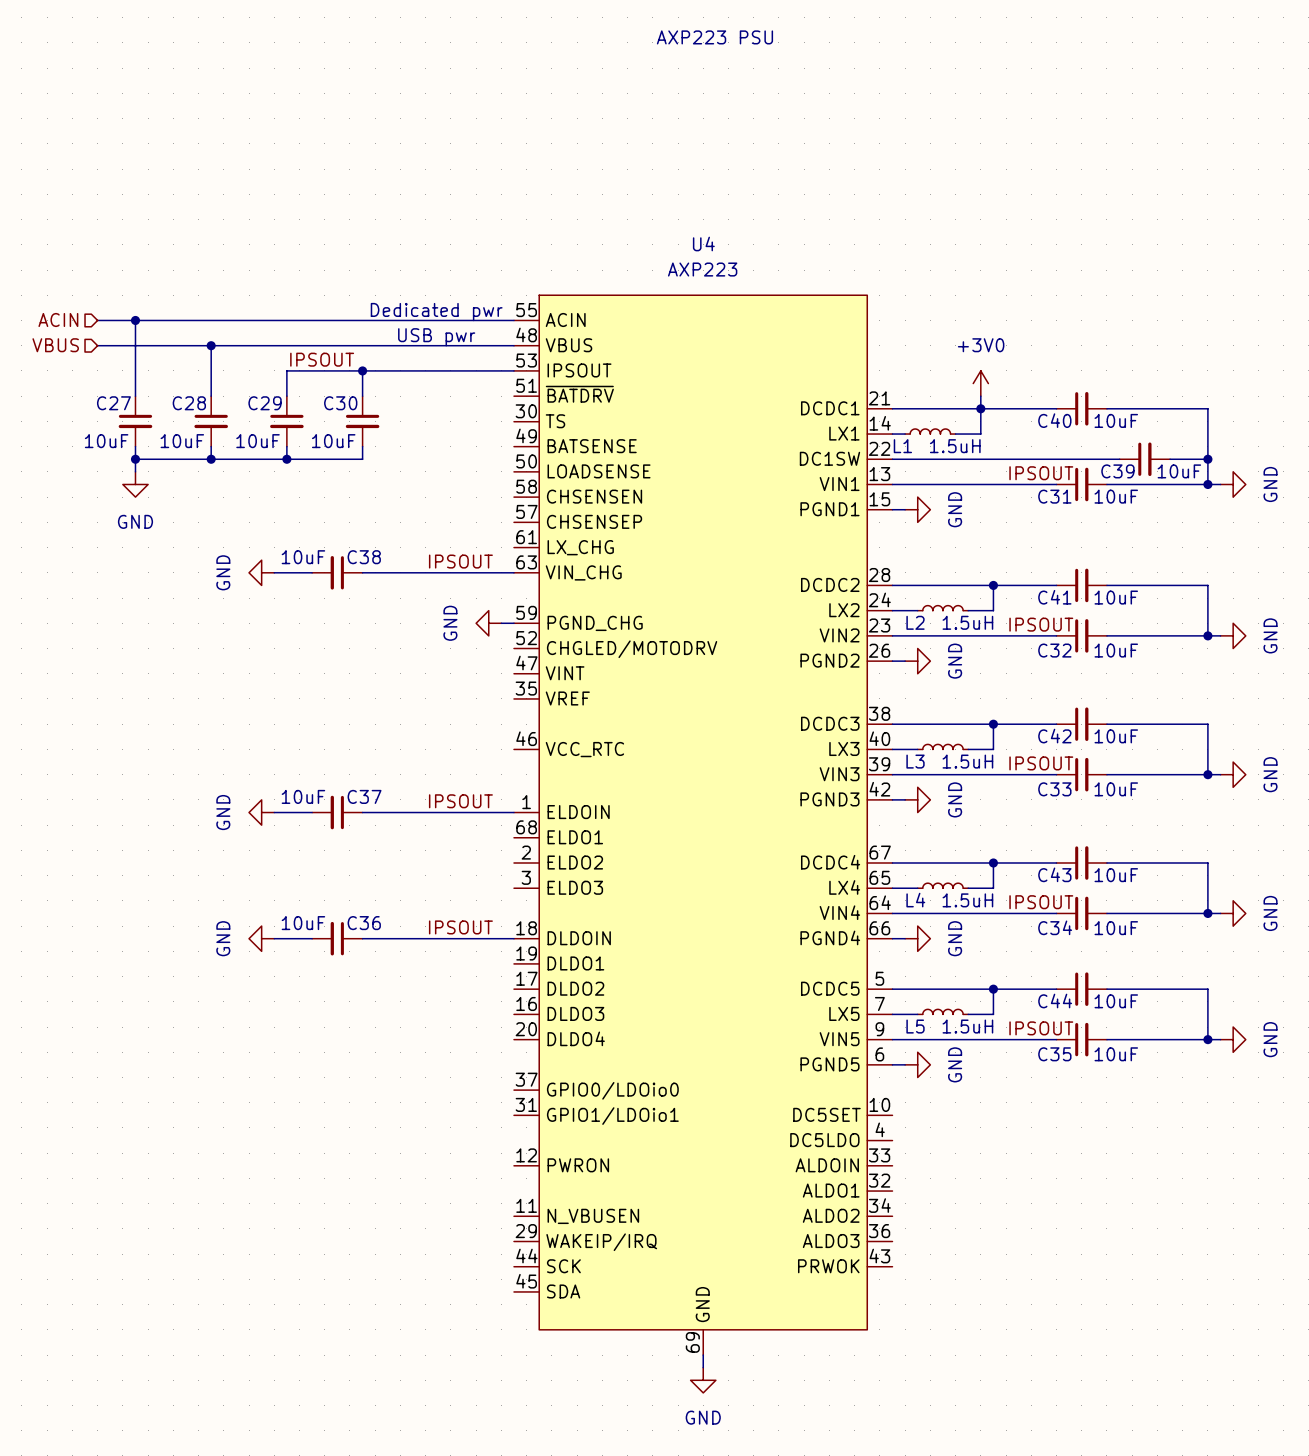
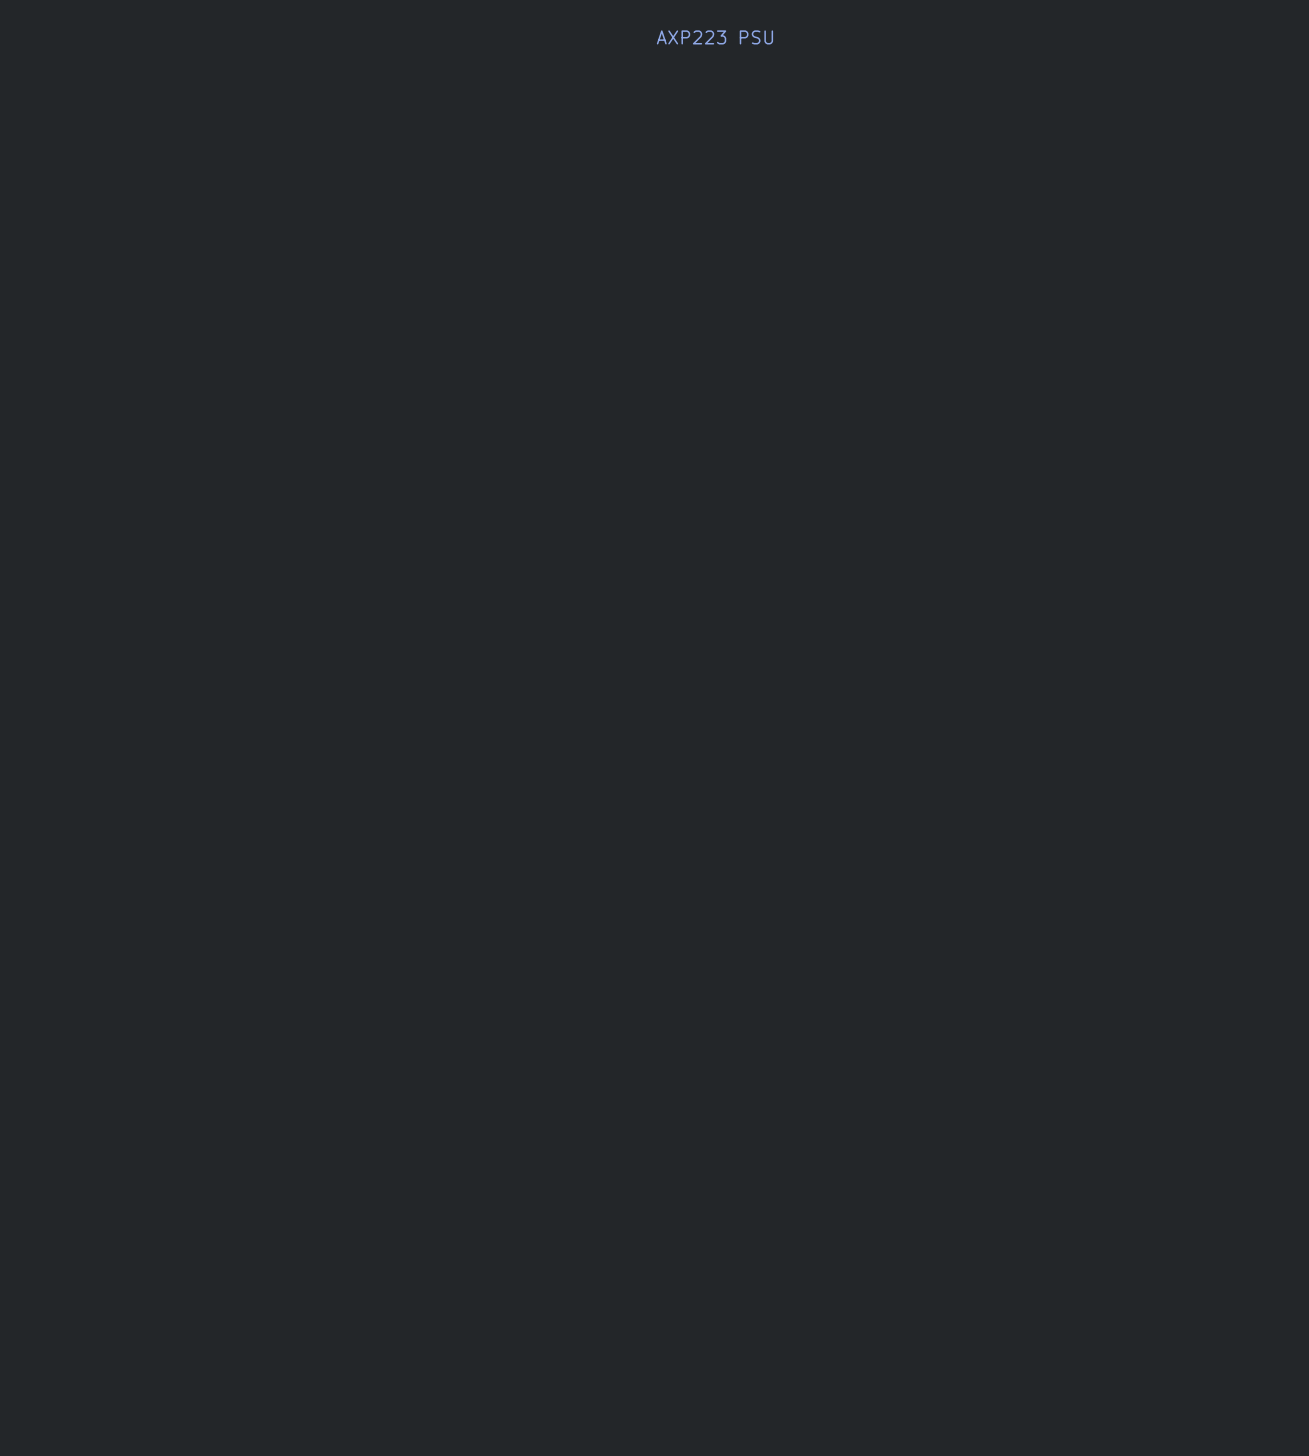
text: Dedicated pwr (436, 312) -> none
hierarchical label: ACIN (58, 320) -> none
wire: (97, 320) (513, 320) -> none
wire: (135, 320) (135, 396) -> none
junction: (135, 320) -> none
text: USB pwr (436, 337) -> none
hierarchical label: VBUS (55, 345) -> none
wire: (97, 345) (513, 345) -> none
wire: (211, 345) (211, 396) -> none
junction: (211, 345) -> none
label: IPSOUT (322, 359) -> none
wire: (362, 370) (362, 396) -> none
junction: (362, 370) -> none
wire: (513, 370) (286, 370) (286, 396) -> none
power symbol: +3V0 (980, 383) -> none
wire: (980, 396) (980, 434) (955, 434) -> none
wire: (892, 408) (1056, 408) -> none
junction: (980, 408) -> none
C40: 10uF (1081, 408) -> none
wire: (1106, 408) (1207, 408) (1207, 484) -> none
C27: 10uF (135, 421) -> none
C28: 10uF (211, 421) -> none
C29: 10uF (286, 421) -> none
C30: 10uF (362, 421) -> none
L1: 1.5uH (930, 431) -> none
wire: (892, 434) (905, 434) -> none
wire: (135, 446) (135, 471) -> none
wire: (211, 446) (211, 459) -> none
wire: (286, 446) (286, 459) -> none
wire: (362, 446) (362, 459) (135, 459) -> none
junction: (135, 459) -> none
junction: (211, 459) -> none
junction: (286, 459) -> none
wire: (892, 459) (1119, 459) -> none
C39: 10uF (1144, 459) -> none
wire: (1170, 459) (1207, 459) -> none
junction: (1207, 459) -> none
label: IPSOUT (1041, 473) -> none
power symbol: GND (135, 484) -> none
wire: (892, 484) (1056, 484) -> none
C31: 10uF (1081, 484) -> none
wire: (1106, 484) (1220, 484) -> none
junction: (1207, 484) -> none
power symbol: GND (1233, 484) -> none
wire: (892, 509) (905, 509) -> none
power symbol: GND (917, 509) -> none
label: IPSOUT (460, 561) -> none
power symbol: GND (261, 572) -> none
wire: (274, 572) (312, 572) -> none
C38: 10uF (337, 572) -> none
wire: (362, 572) (513, 572) -> none
wire: (892, 585) (1056, 585) -> none
wire: (993, 585) (993, 610) (968, 610) -> none
junction: (993, 585) -> none
C41: 10uF (1081, 585) -> none
wire: (1106, 585) (1207, 585) (1207, 635) -> none
L2: 1.5uH (942, 608) -> none
wire: (892, 610) (917, 610) -> none
power symbol: GND (488, 623) -> none
wire: (501, 623) (513, 623) -> none
label: IPSOUT (1041, 624) -> none
wire: (892, 635) (1056, 635) -> none
C32: 10uF (1081, 635) -> none
wire: (1106, 635) (1220, 635) -> none
junction: (1207, 635) -> none
power symbol: GND (1233, 635) -> none
wire: (892, 661) (905, 661) -> none
power symbol: GND (917, 661) -> none
wire: (892, 724) (1056, 724) -> none
wire: (993, 724) (993, 749) (968, 749) -> none
junction: (993, 724) -> none
C42: 10uF (1081, 724) -> none
wire: (1106, 724) (1207, 724) (1207, 774) -> none
L3: 1.5uH (942, 746) -> none
wire: (892, 749) (917, 749) -> none
label: IPSOUT (1041, 763) -> none
wire: (892, 774) (1056, 774) -> none
C33: 10uF (1081, 774) -> none
wire: (1106, 774) (1220, 774) -> none
junction: (1207, 774) -> none
power symbol: GND (1233, 774) -> none
wire: (892, 799) (905, 799) -> none
power symbol: GND (917, 799) -> none
label: IPSOUT (460, 801) -> none
power symbol: GND (261, 812) -> none
wire: (274, 812) (312, 812) -> none
C37: 10uF (337, 812) -> none
wire: (362, 812) (513, 812) -> none
U4: AXP223 (703, 825) -> none
wire: (892, 862) (1056, 862) -> none
wire: (993, 862) (993, 888) (968, 888) -> none
junction: (993, 862) -> none
C43: 10uF (1081, 862) -> none
wire: (1106, 862) (1207, 862) (1207, 913) -> none
L4: 1.5uH (942, 885) -> none
wire: (892, 888) (917, 888) -> none
label: IPSOUT (1041, 902) -> none
wire: (892, 913) (1056, 913) -> none
C34: 10uF (1081, 913) -> none
wire: (1106, 913) (1220, 913) -> none
junction: (1207, 913) -> none
power symbol: GND (1233, 913) -> none
label: IPSOUT (460, 927) -> none
power symbol: GND (261, 938) -> none
wire: (274, 938) (312, 938) -> none
C36: 10uF (337, 938) -> none
wire: (362, 938) (513, 938) -> none
wire: (892, 938) (905, 938) -> none
power symbol: GND (917, 938) -> none
wire: (892, 989) (1056, 989) -> none
wire: (993, 989) (993, 1014) (968, 1014) -> none
junction: (993, 989) -> none
C44: 10uF (1081, 989) -> none
wire: (1106, 989) (1207, 989) (1207, 1039) -> none
L5: 1.5uH (942, 1011) -> none
wire: (892, 1014) (917, 1014) -> none
label: IPSOUT (1041, 1028) -> none
wire: (892, 1039) (1056, 1039) -> none
C35: 10uF (1081, 1039) -> none
wire: (1106, 1039) (1220, 1039) -> none
junction: (1207, 1039) -> none
power symbol: GND (1233, 1039) -> none
wire: (892, 1064) (905, 1064) -> none
power symbol: GND (917, 1064) -> none
wire: (703, 1355) (703, 1367) -> none
power symbol: GND (703, 1380) -> none

